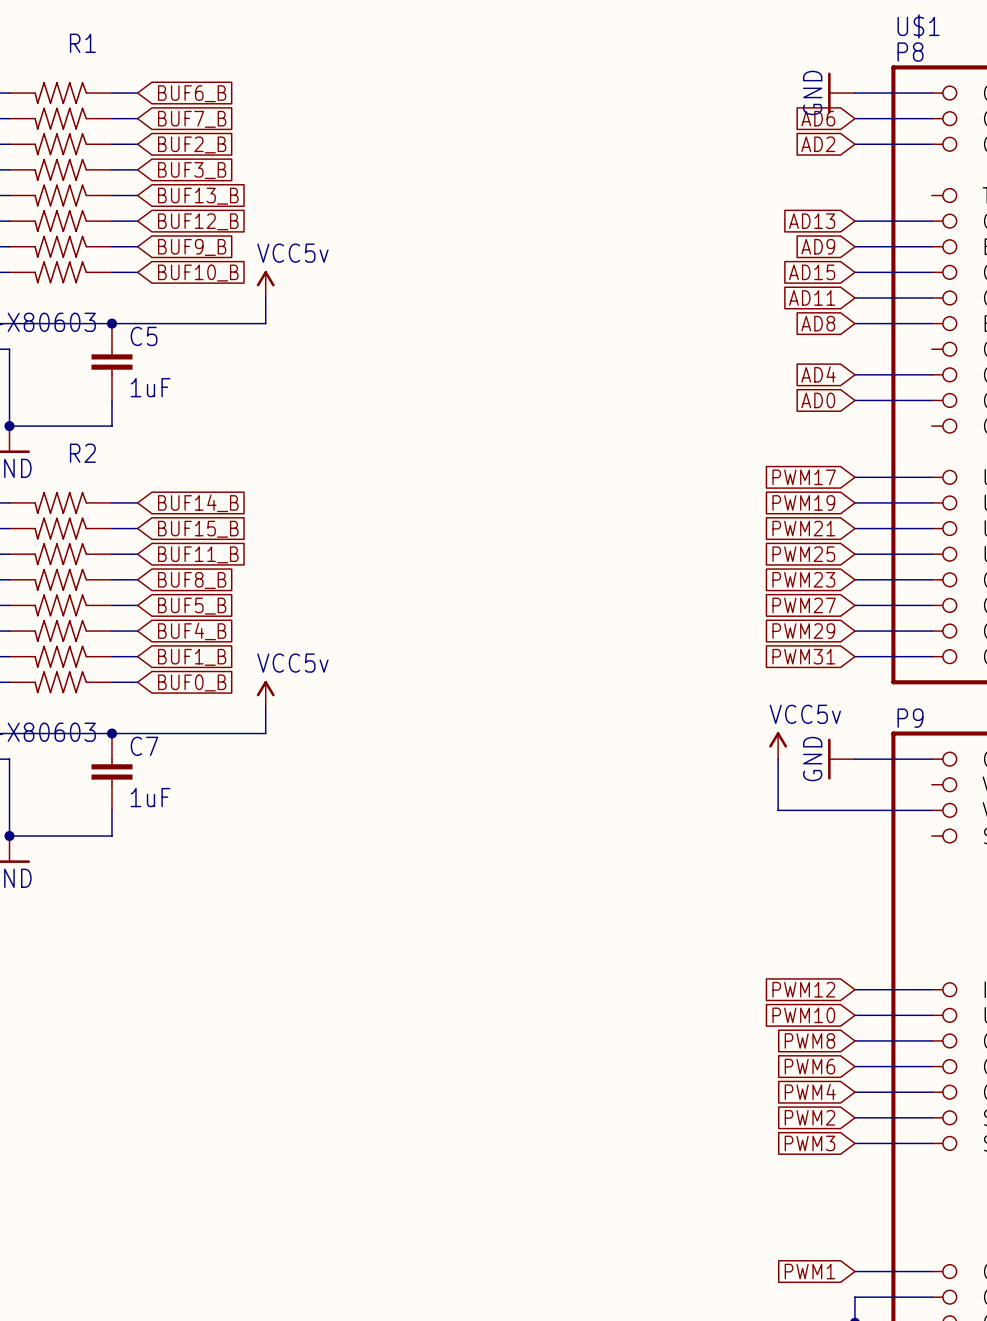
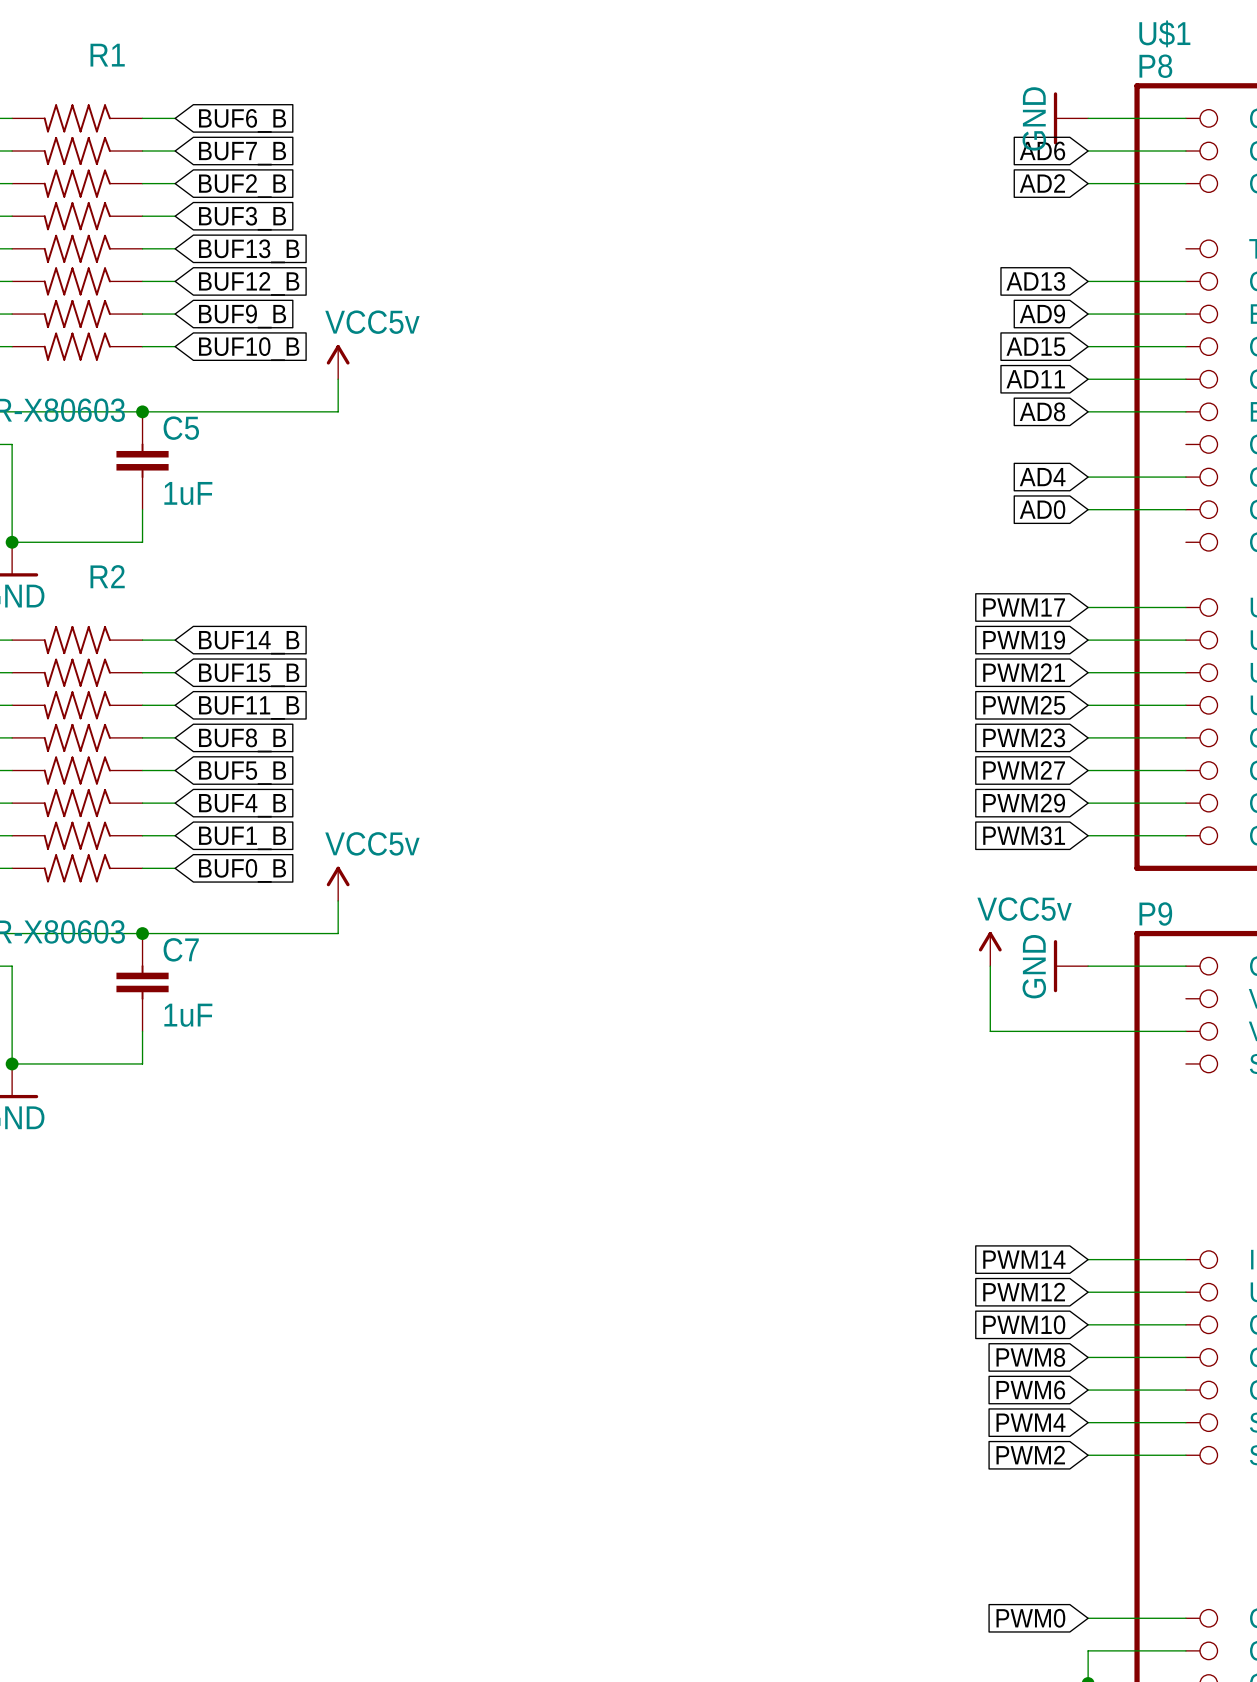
global label: PWM12 (803, 989) -> PWM14 (1024, 1259)
global label: PWM10 (803, 1015) -> PWM12 (1024, 1292)
global label: PWM8 (809, 1040) -> PWM10 (1024, 1324)
global label: PWM6 (809, 1066) -> PWM8 (1030, 1357)
global label: PWM4 (810, 1091) -> PWM6 (1030, 1390)
global label: PWM2 (809, 1117) -> PWM4 (1031, 1422)
global label: PWM3 (809, 1143) -> PWM2 (1030, 1455)
global label: PWM1 (809, 1271) -> PWM0 (1030, 1618)

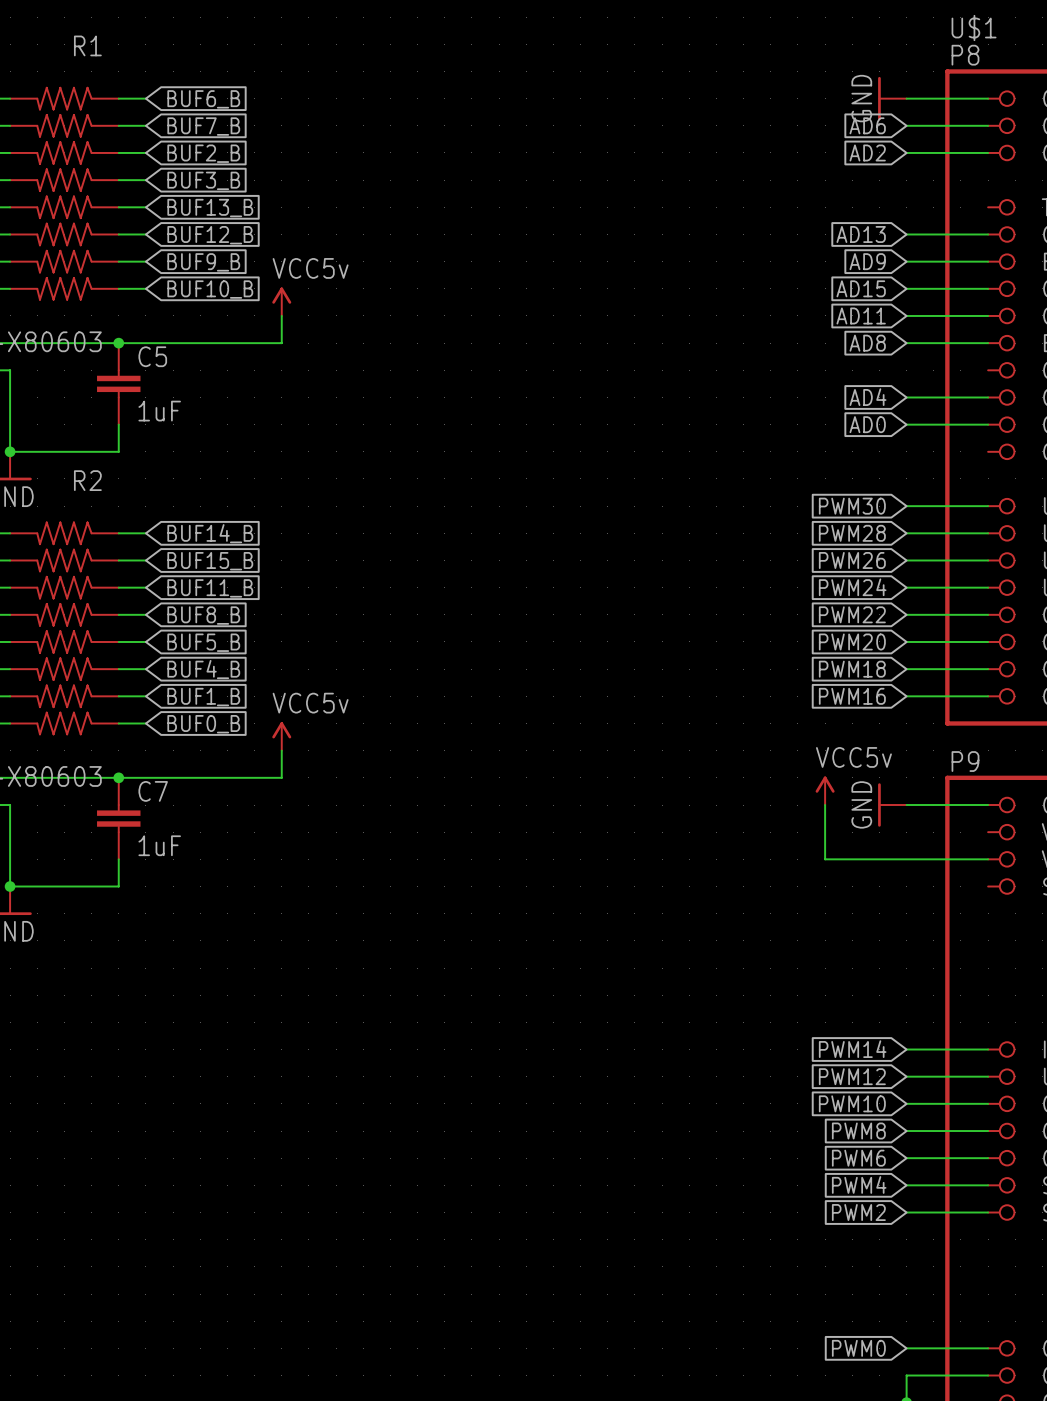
global label: PWM17 (1024, 607) -> PWM30 (852, 506)
global label: PWM19 (1024, 640) -> PWM28 (852, 533)
global label: PWM21 (1024, 672) -> PWM26 (852, 560)
global label: PWM25 (1024, 705) -> PWM24 (852, 587)
global label: PWM23 (1024, 737) -> PWM22 (852, 614)
global label: PWM27 (1024, 770) -> PWM20 (852, 641)
global label: PWM29 (1024, 803) -> PWM18 (852, 669)
global label: PWM31 (1024, 835) -> PWM16 (852, 696)

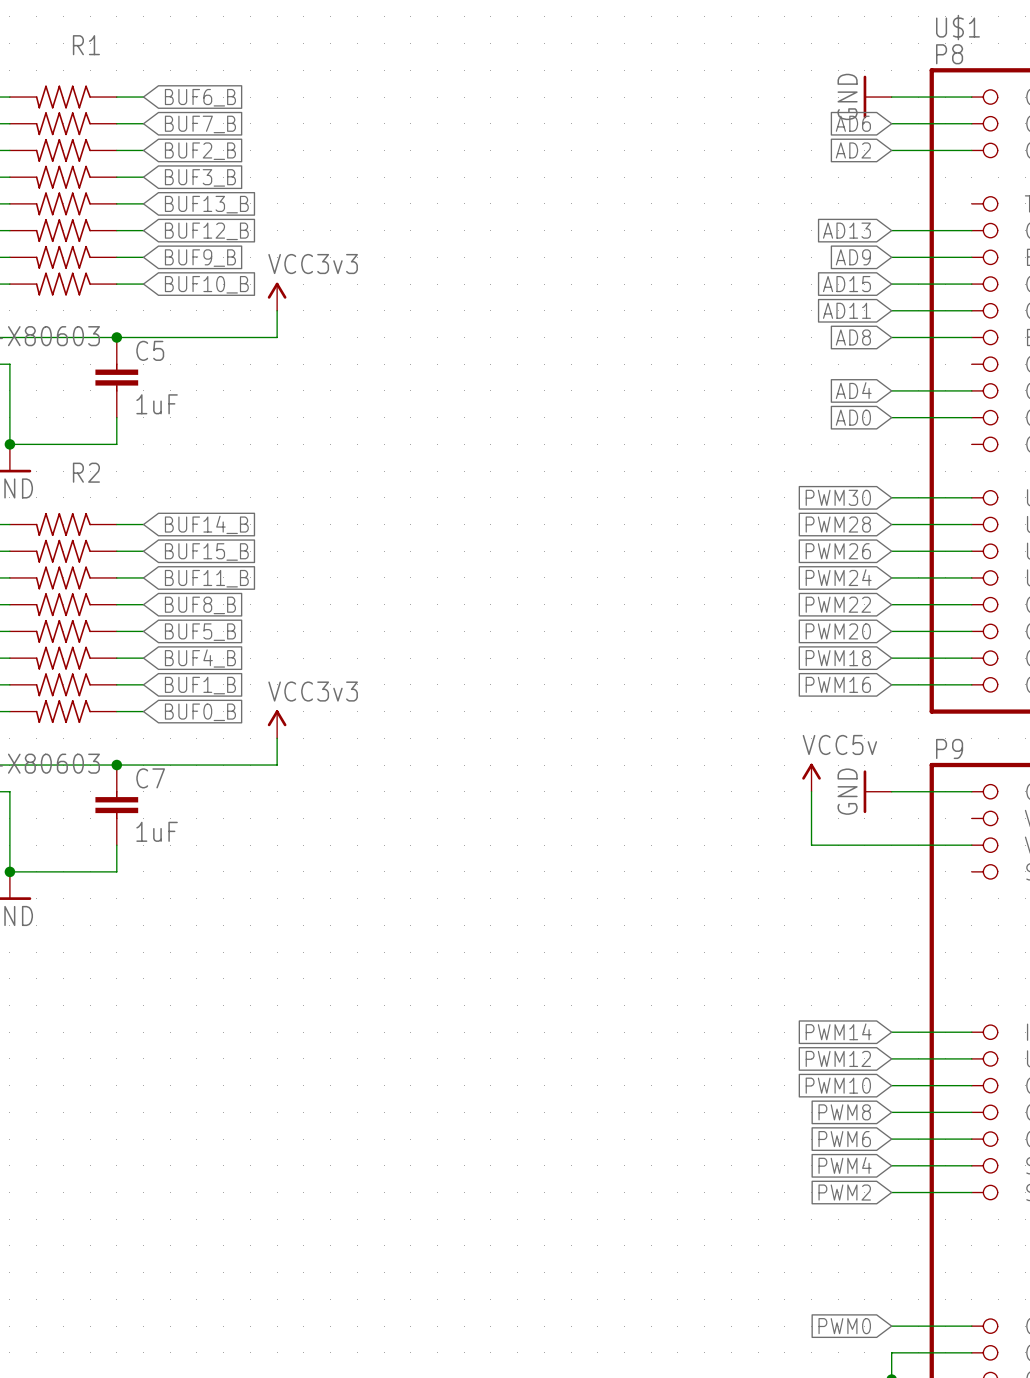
power symbol: VCC5v (281, 301) -> VCC3v3 (277, 296)
power symbol: VCC5v (281, 736) -> VCC3v3 (277, 724)

